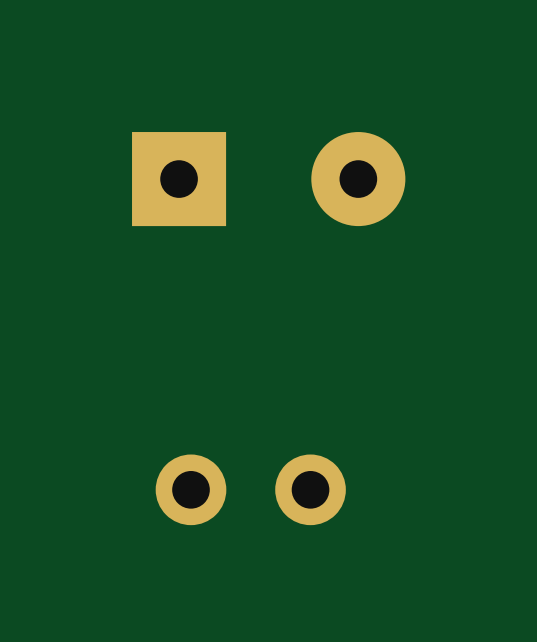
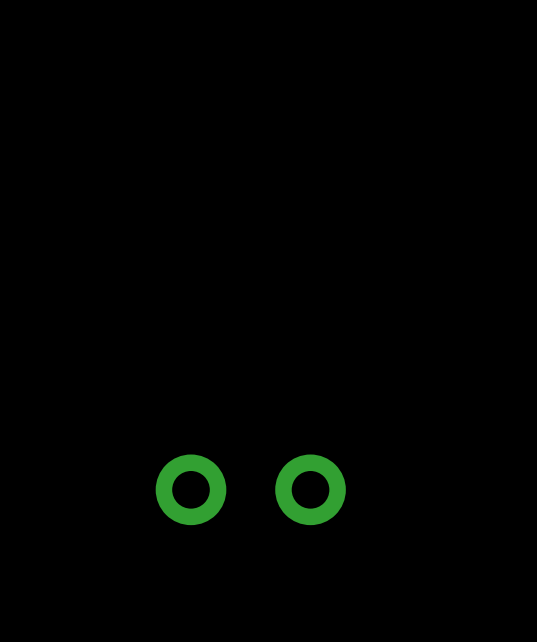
part: (268, 179) -> none

